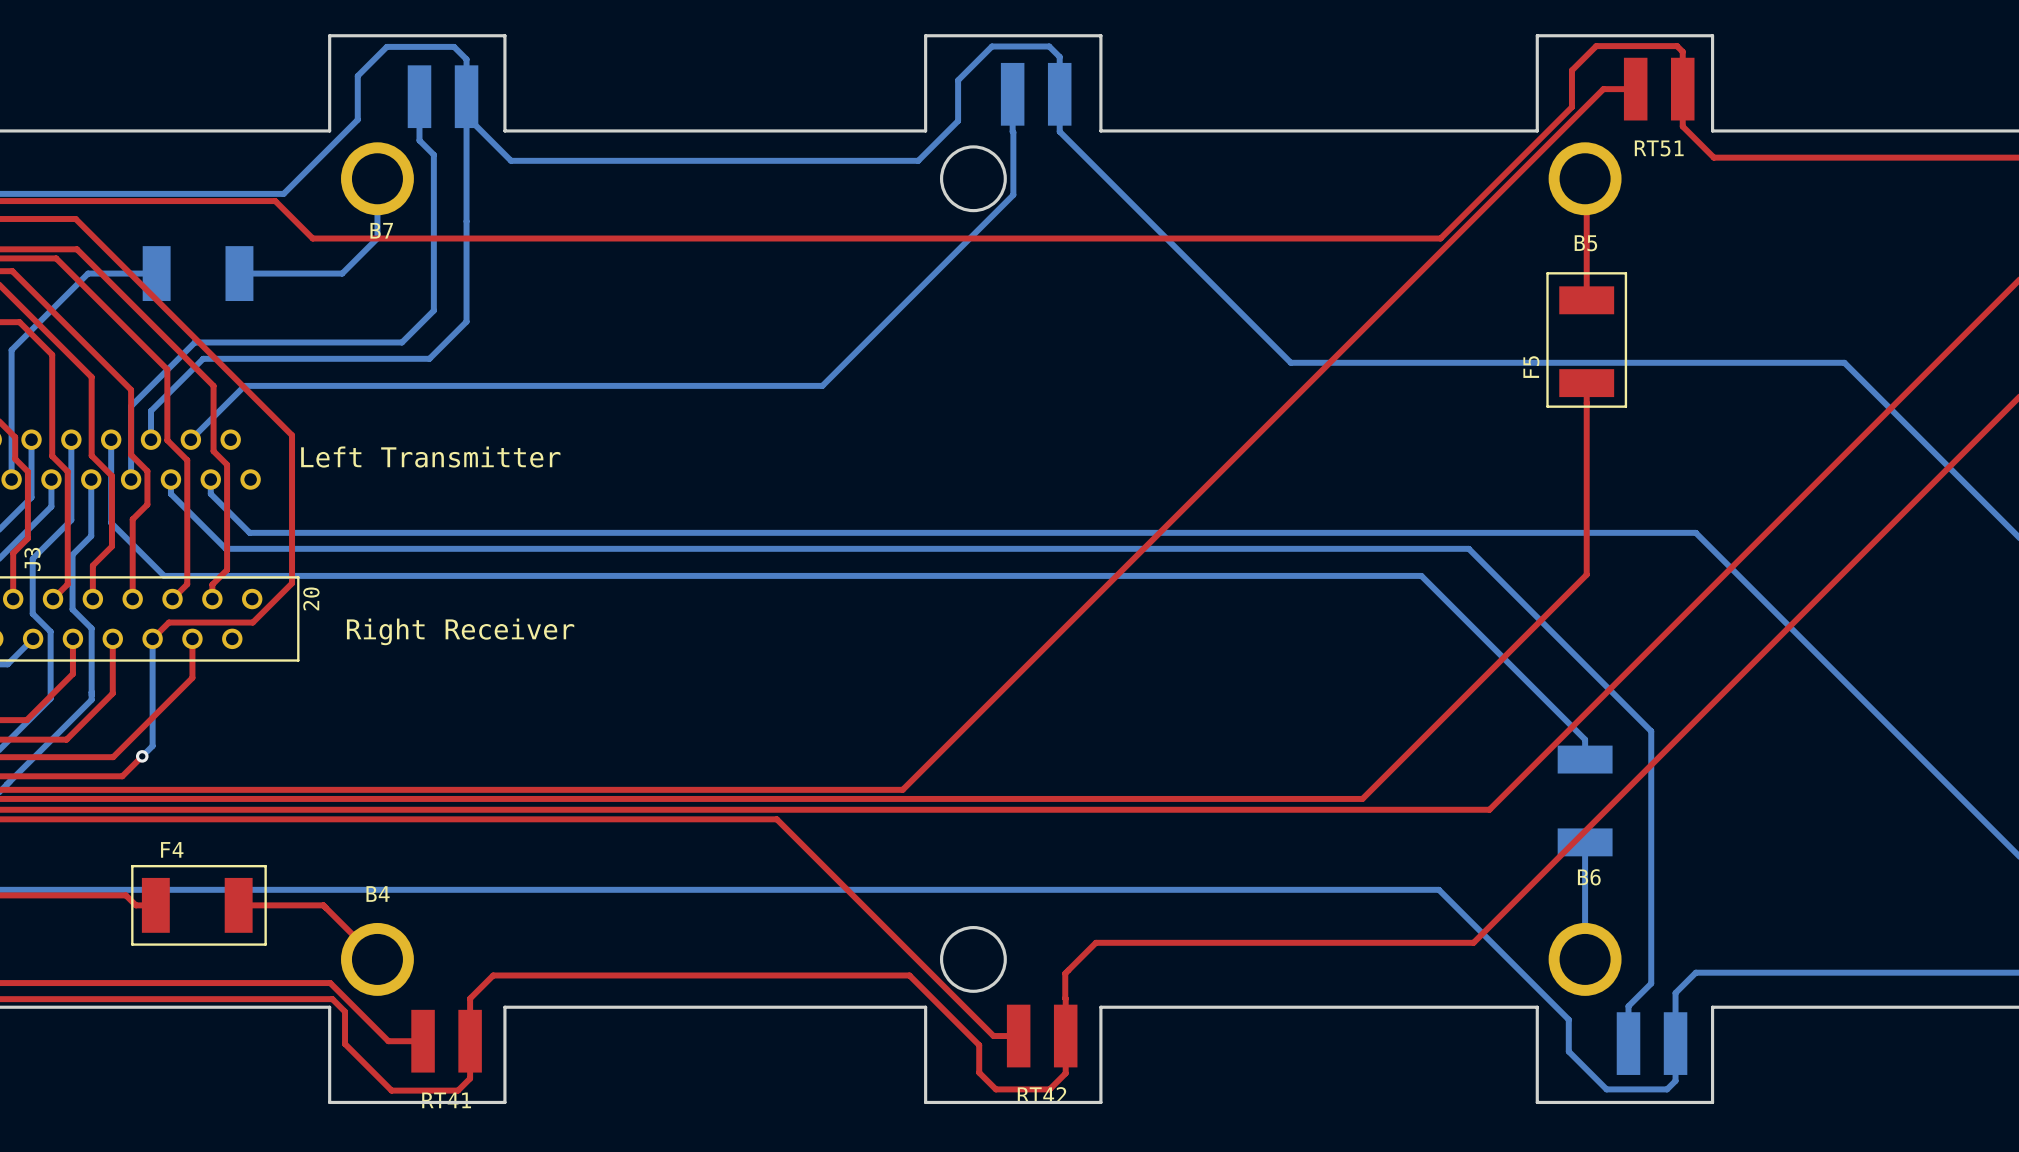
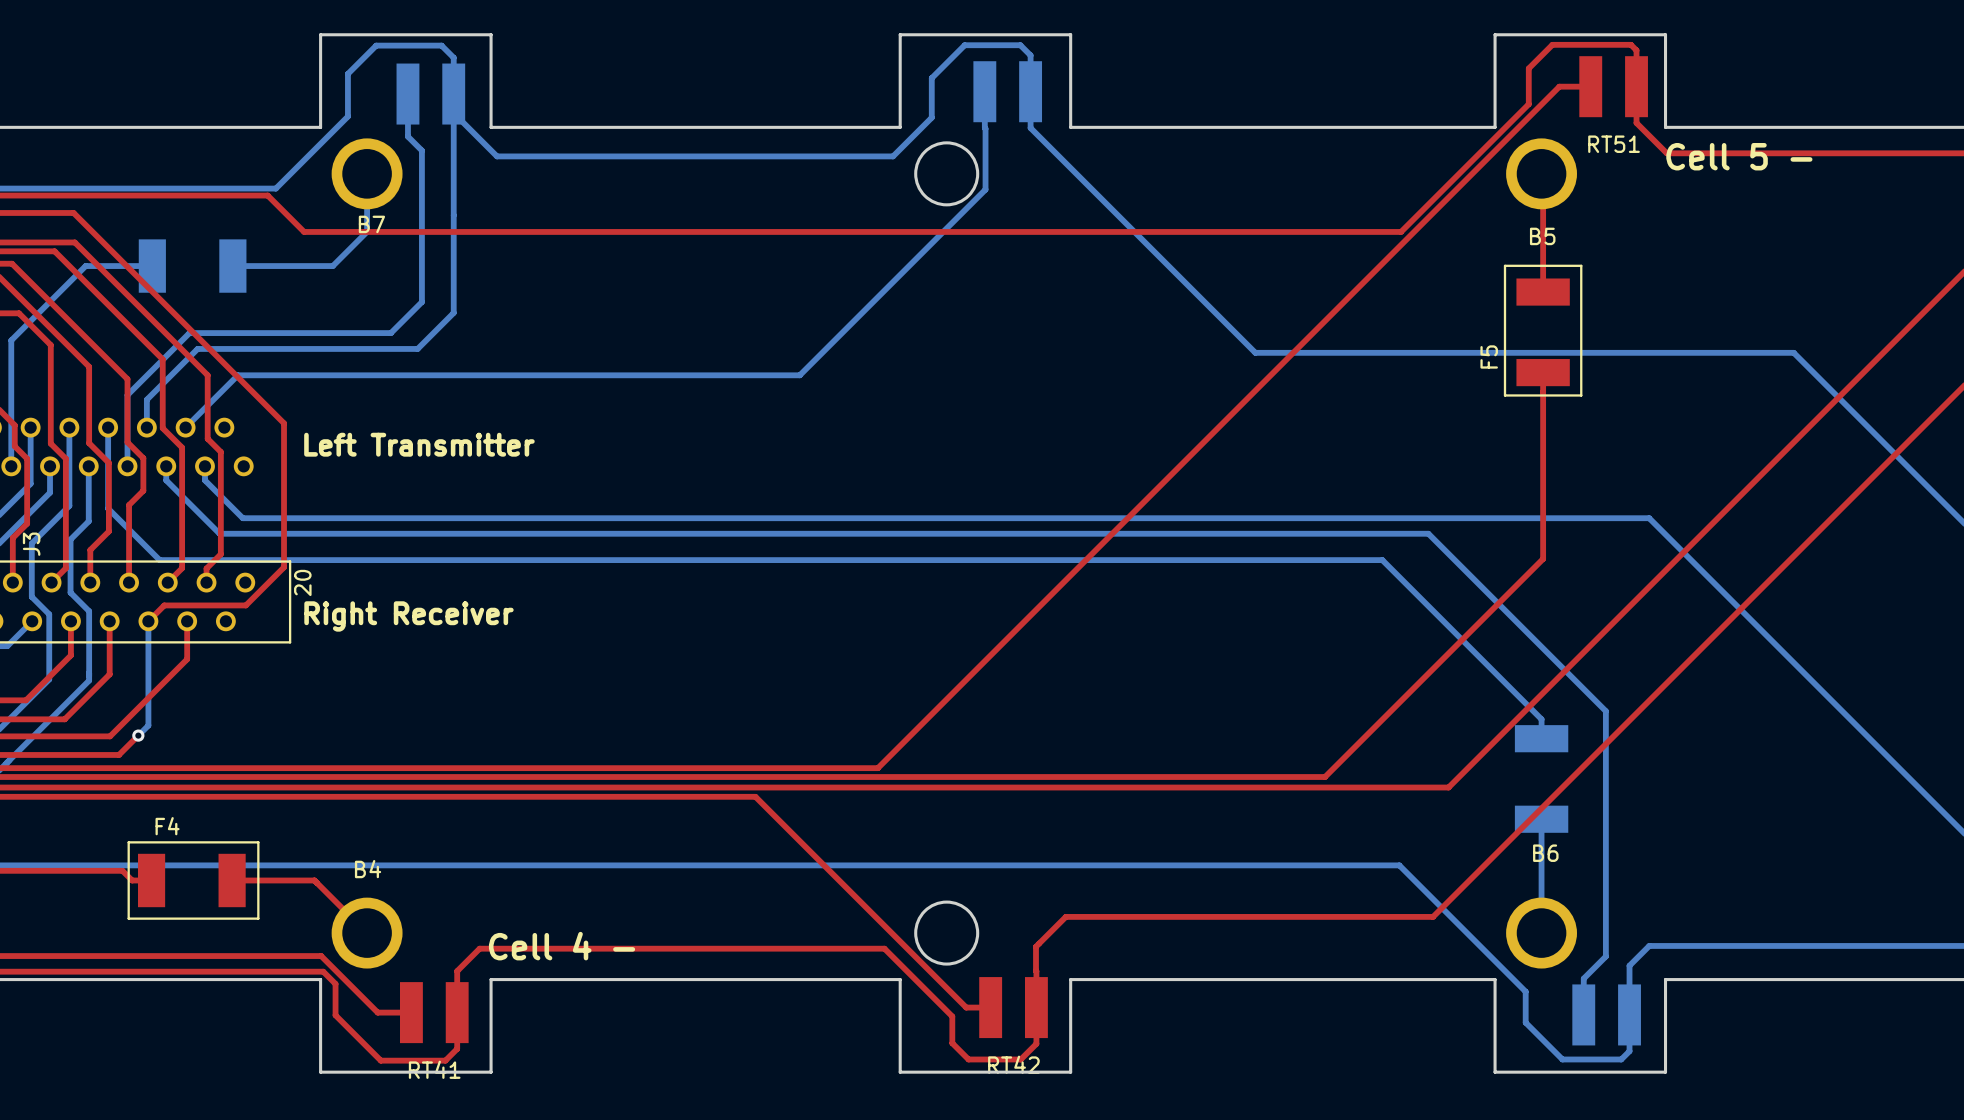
text: none -> Cell 5 - (1739, 156)
text position: Right Receiver (460, 631) -> Right Receiver (408, 616)
text: none -> Cell 4 - (562, 946)

